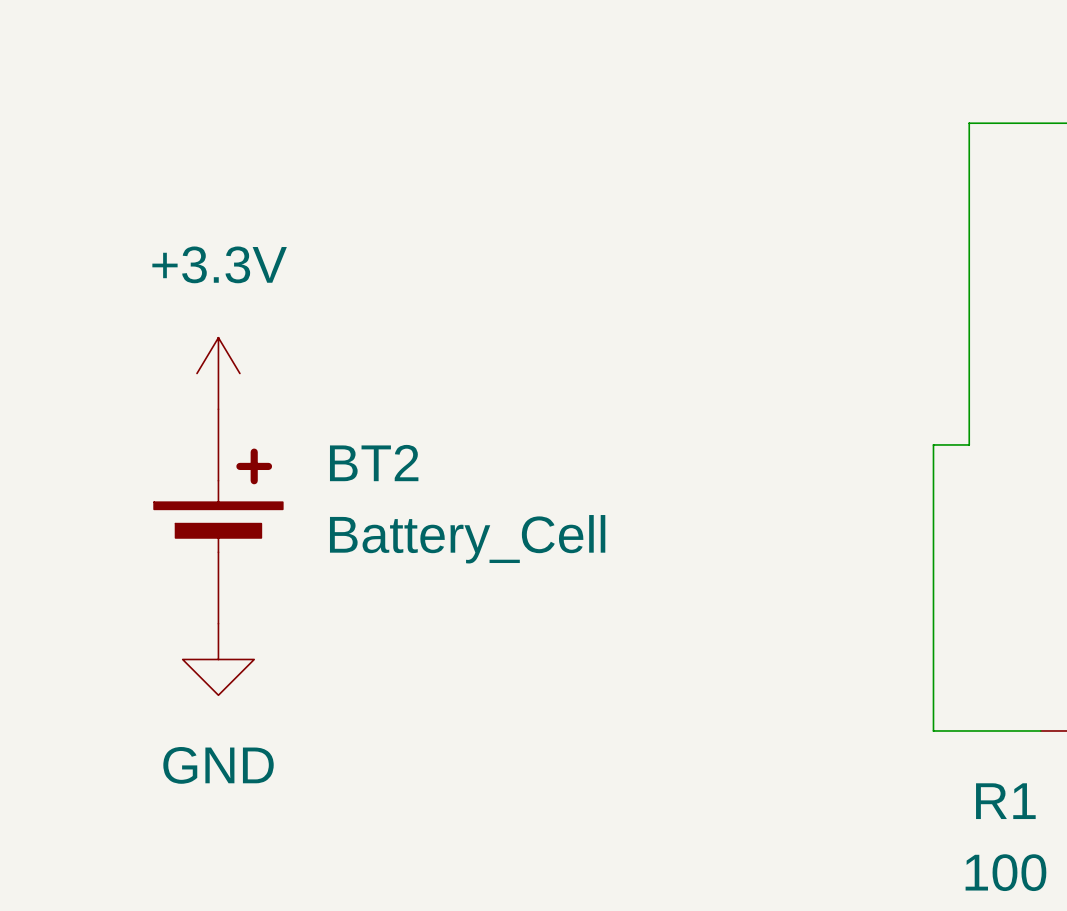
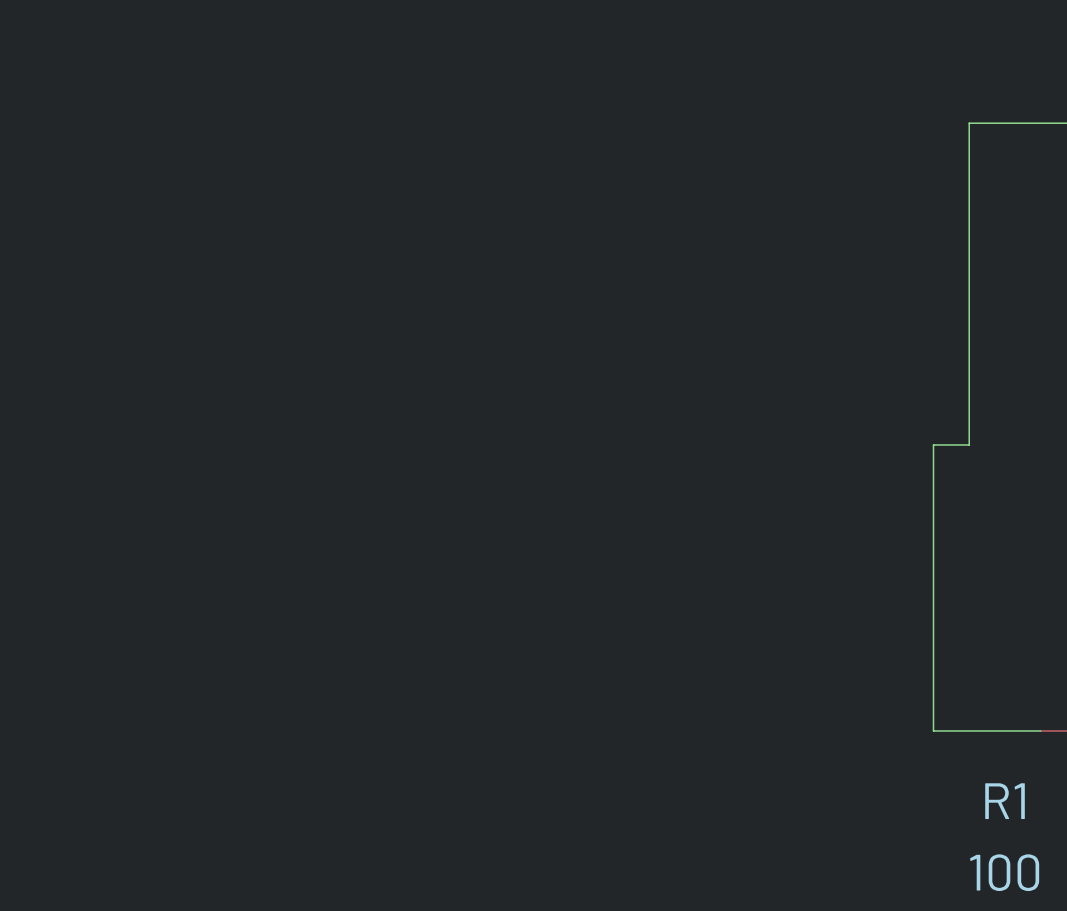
power symbol: +3.3V (218, 373) -> none
BT2: Battery_Cell (218, 516) -> none
power symbol: GND (218, 659) -> none

